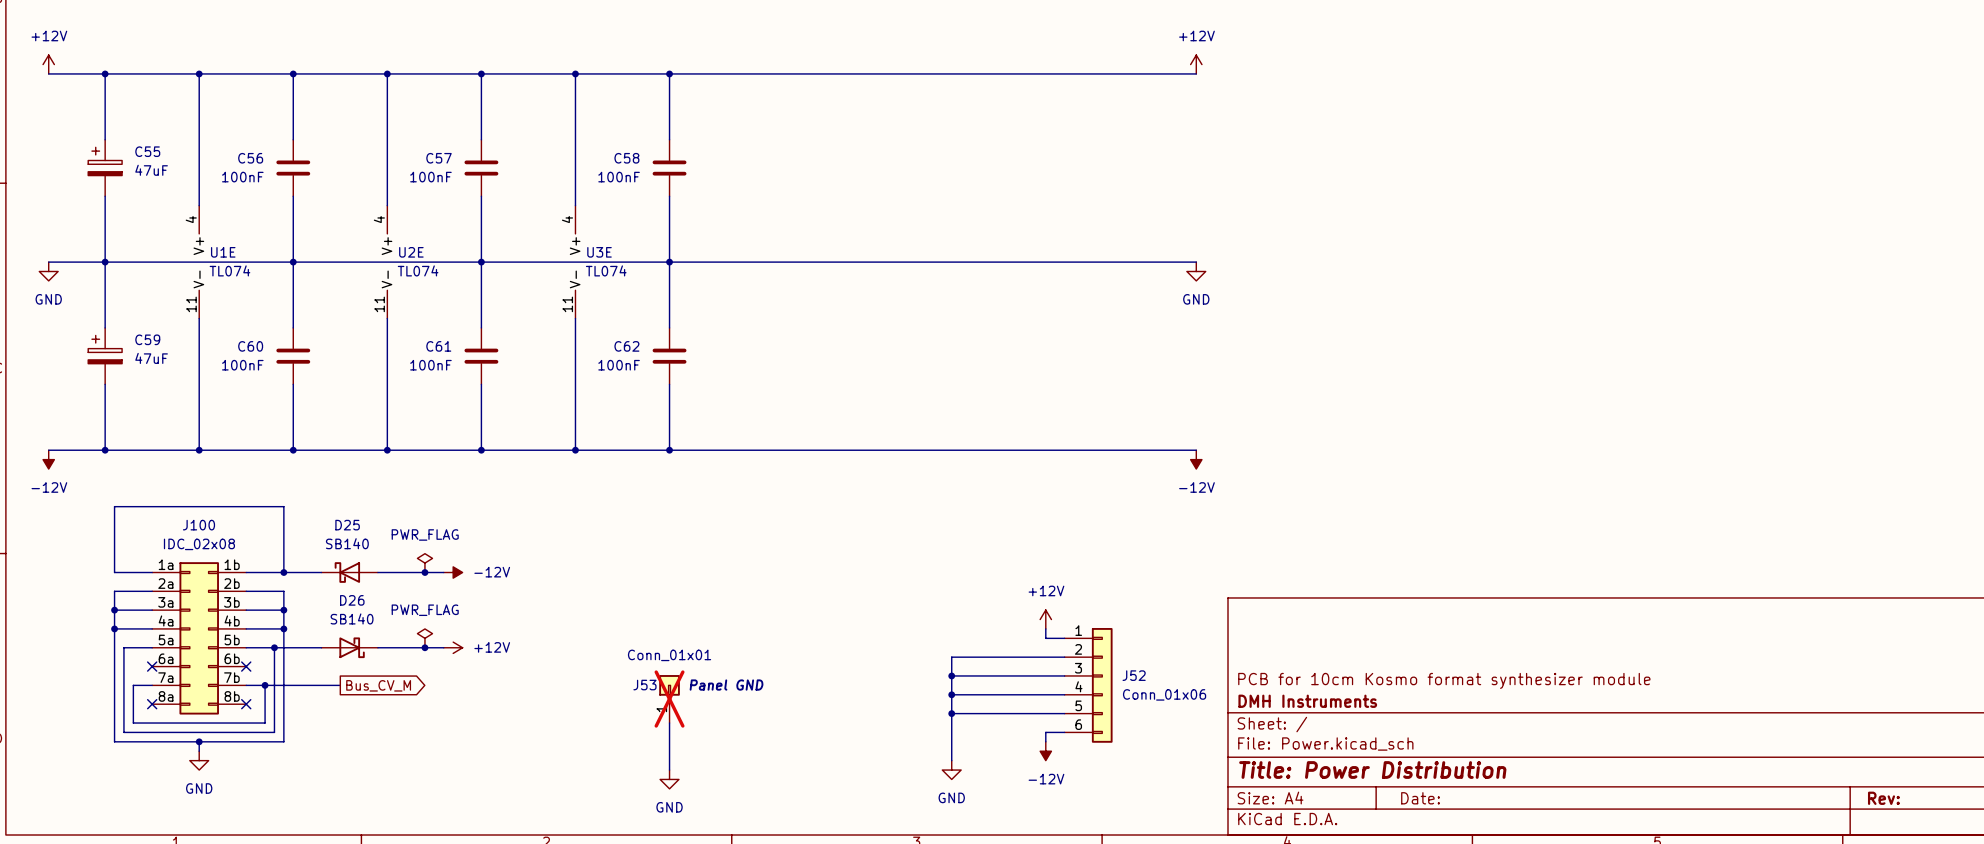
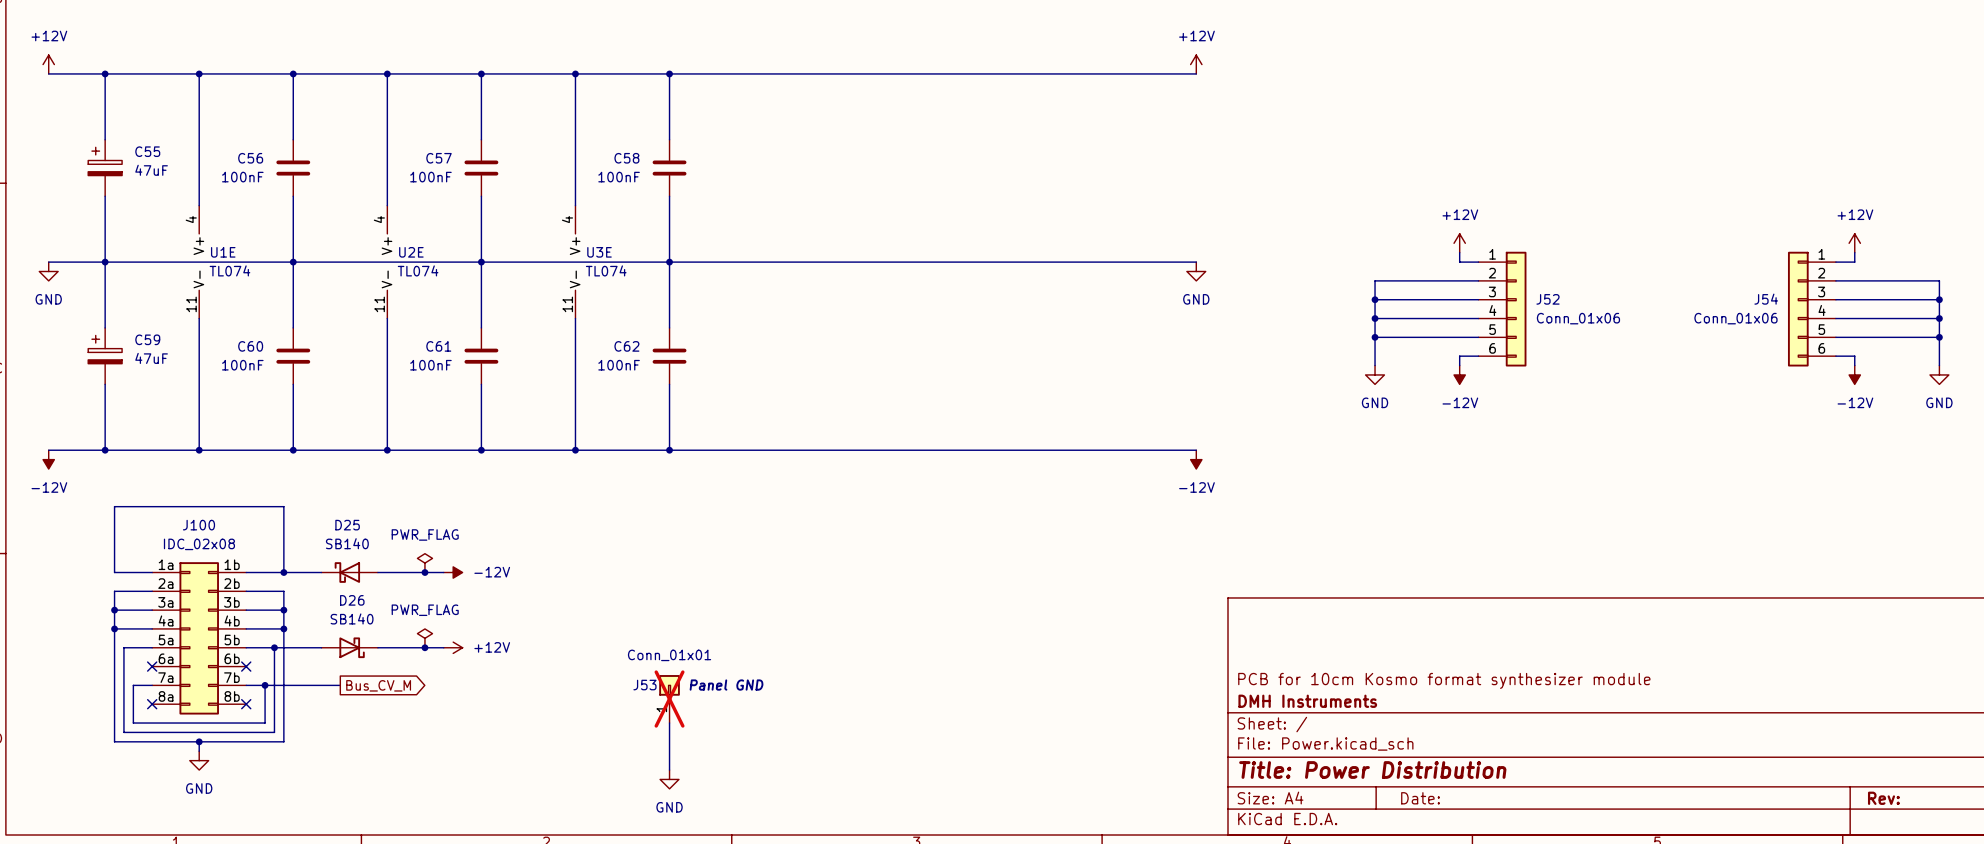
power symbol: none -> +12V (1459, 243)
power symbol: none -> +12V (1854, 243)
wire: none -> (1459, 252) (1459, 262) (1478, 262)
wire: none -> (1854, 252) (1854, 262) (1835, 262)
wire: none -> (1478, 280) (1375, 280) (1375, 365)
wire: none -> (1835, 280) (1939, 280) (1939, 365)
wire: none -> (1375, 299) (1478, 299)
junction: none -> (1375, 299)
wire: none -> (1835, 299) (1939, 299)
junction: none -> (1939, 299)
J54: none -> Conn_01x06 (1811, 309)
wire: none -> (1375, 318) (1478, 318)
junction: none -> (1375, 318)
wire: none -> (1835, 318) (1939, 318)
junction: none -> (1939, 318)
wire: none -> (1375, 337) (1478, 337)
junction: none -> (1375, 337)
wire: none -> (1835, 337) (1939, 337)
junction: none -> (1939, 337)
wire: none -> (1478, 356) (1459, 356) (1459, 365)
wire: none -> (1835, 356) (1854, 356) (1854, 365)
power symbol: none -> GND (1375, 374)
power symbol: none -> -12V (1459, 374)
power symbol: none -> -12V (1854, 374)
power symbol: none -> GND (1939, 374)
power symbol: +12V (1045, 619) -> none
wire: (1045, 628) (1045, 638) (1064, 638) -> none
wire: (1064, 657) (951, 657) (951, 760) -> none
wire: (951, 675) (1064, 675) -> none
junction: (951, 675) -> none
J52 position: (1088, 685) -> (1502, 309)
wire: (951, 694) (1064, 694) -> none
junction: (951, 694) -> none
wire: (951, 713) (1064, 713) -> none
junction: (951, 713) -> none
wire: (1064, 732) (1045, 732) (1045, 741) -> none
power symbol: -12V (1045, 751) -> none
power symbol: GND (951, 770) -> none

